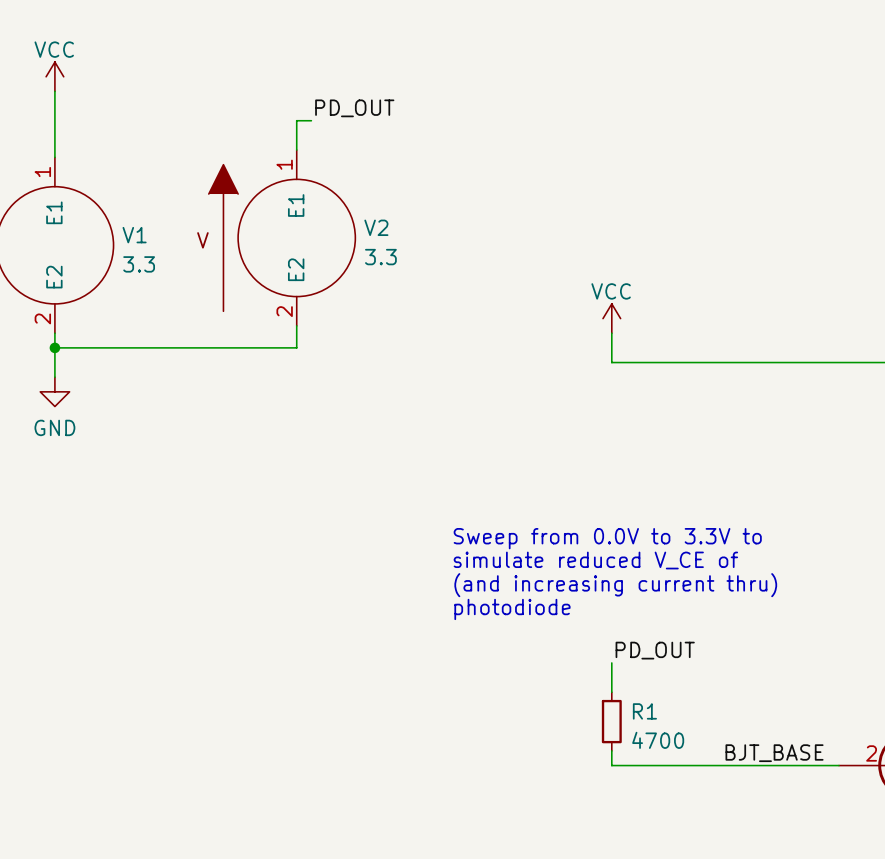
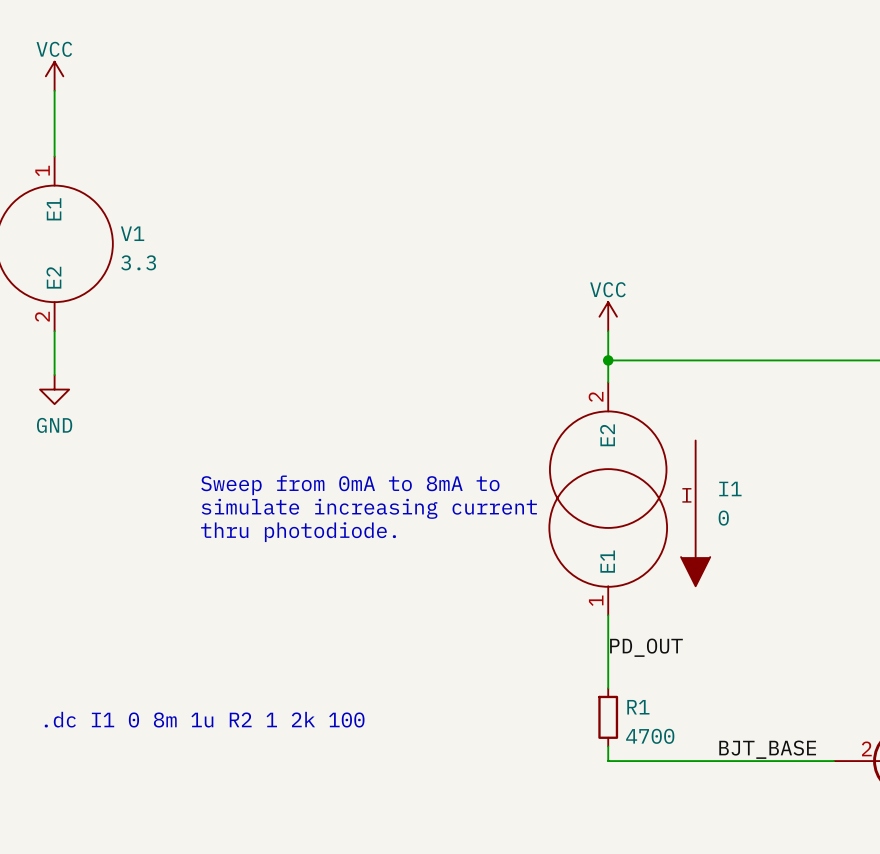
label: PD_OUT (354, 108) -> none
wire: (311, 120) (296, 120) (296, 150) -> none
V2: 3.3 (282, 237) -> none
wire: (296, 325) (296, 347) (54, 347) -> none
junction: (54, 347) -> none
wire: none -> (608, 360) (608, 382)
junction: none -> (608, 360)
text: none -> Sweep from 0mA to 8mA to (350, 485)
I1: none -> 0 (629, 498)
text: none -> simulate increasing current (369, 508)
text: none -> thru photodiode. (298, 532)
text: Sweep from 0.0V to 3.3V to (607, 538) -> none
text: simulate reduced V_CE of (595, 560) -> none
text: (and increasing current thru) (615, 585) -> none
text: photodiode (512, 609) -> none
wire: none -> (608, 615) (608, 659)
text: none -> .dc I1 0 8m 1u R2 1 2k 100 (204, 719)

